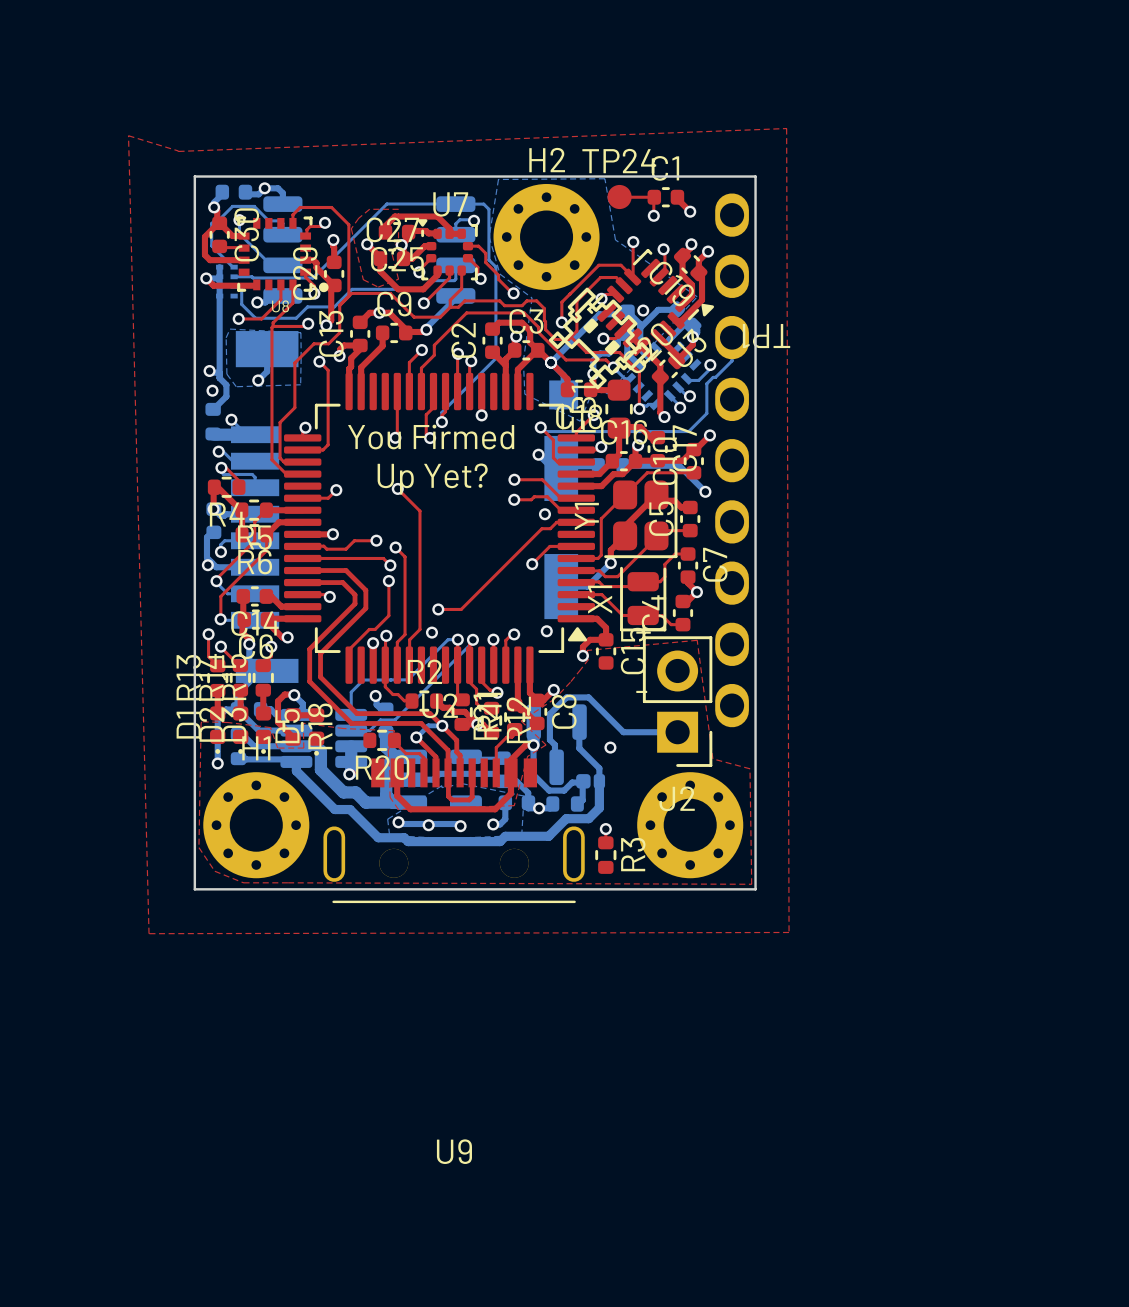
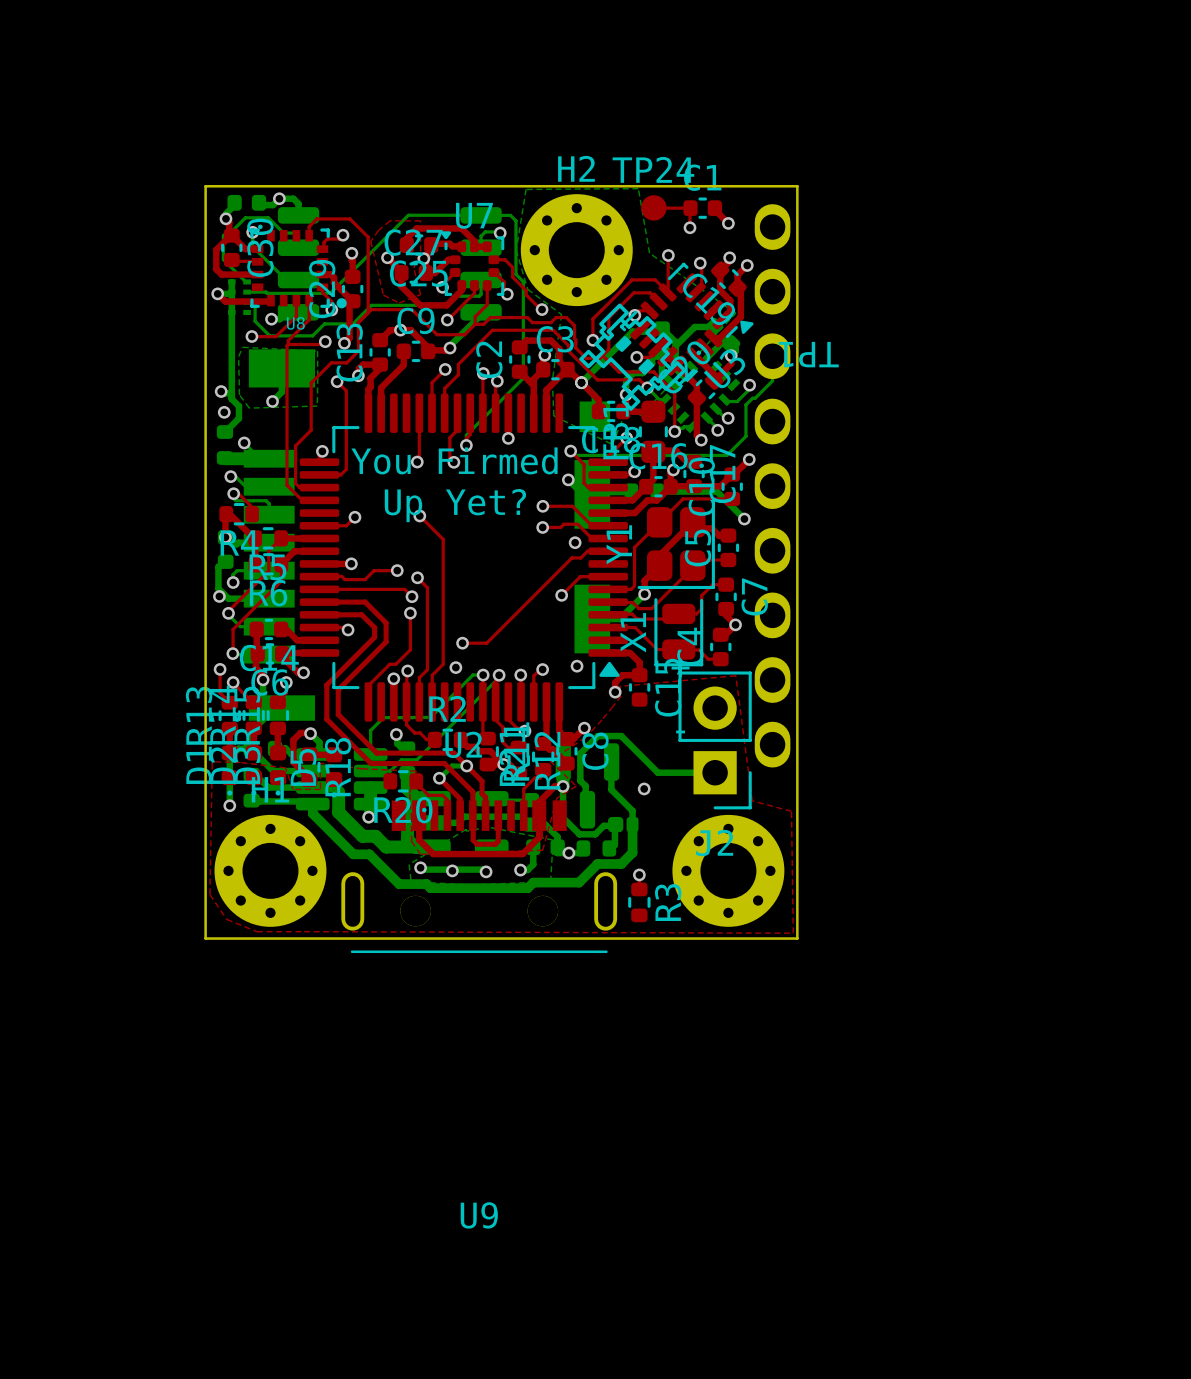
top zone outline: (786, 128) (178, 151) (128, 135) (149, 933) (789, 932) (786, 128) -> none
via: (643, 310) -> none

